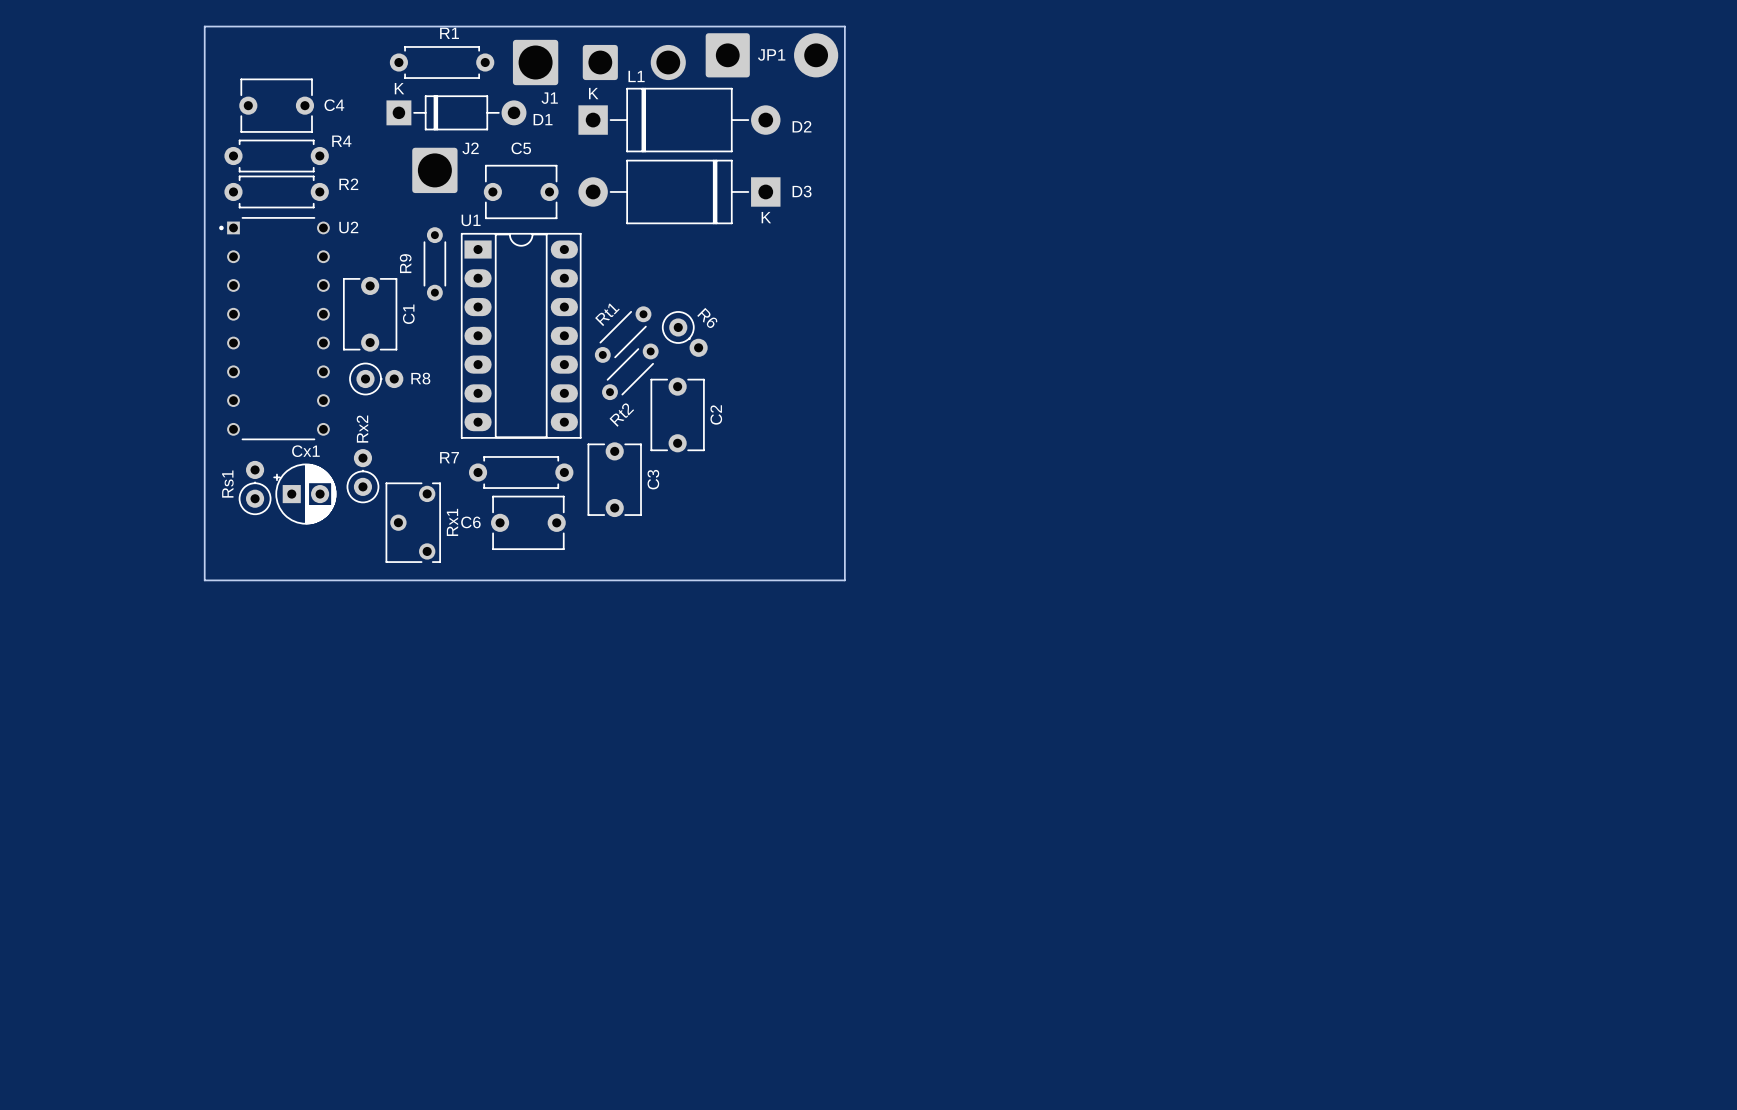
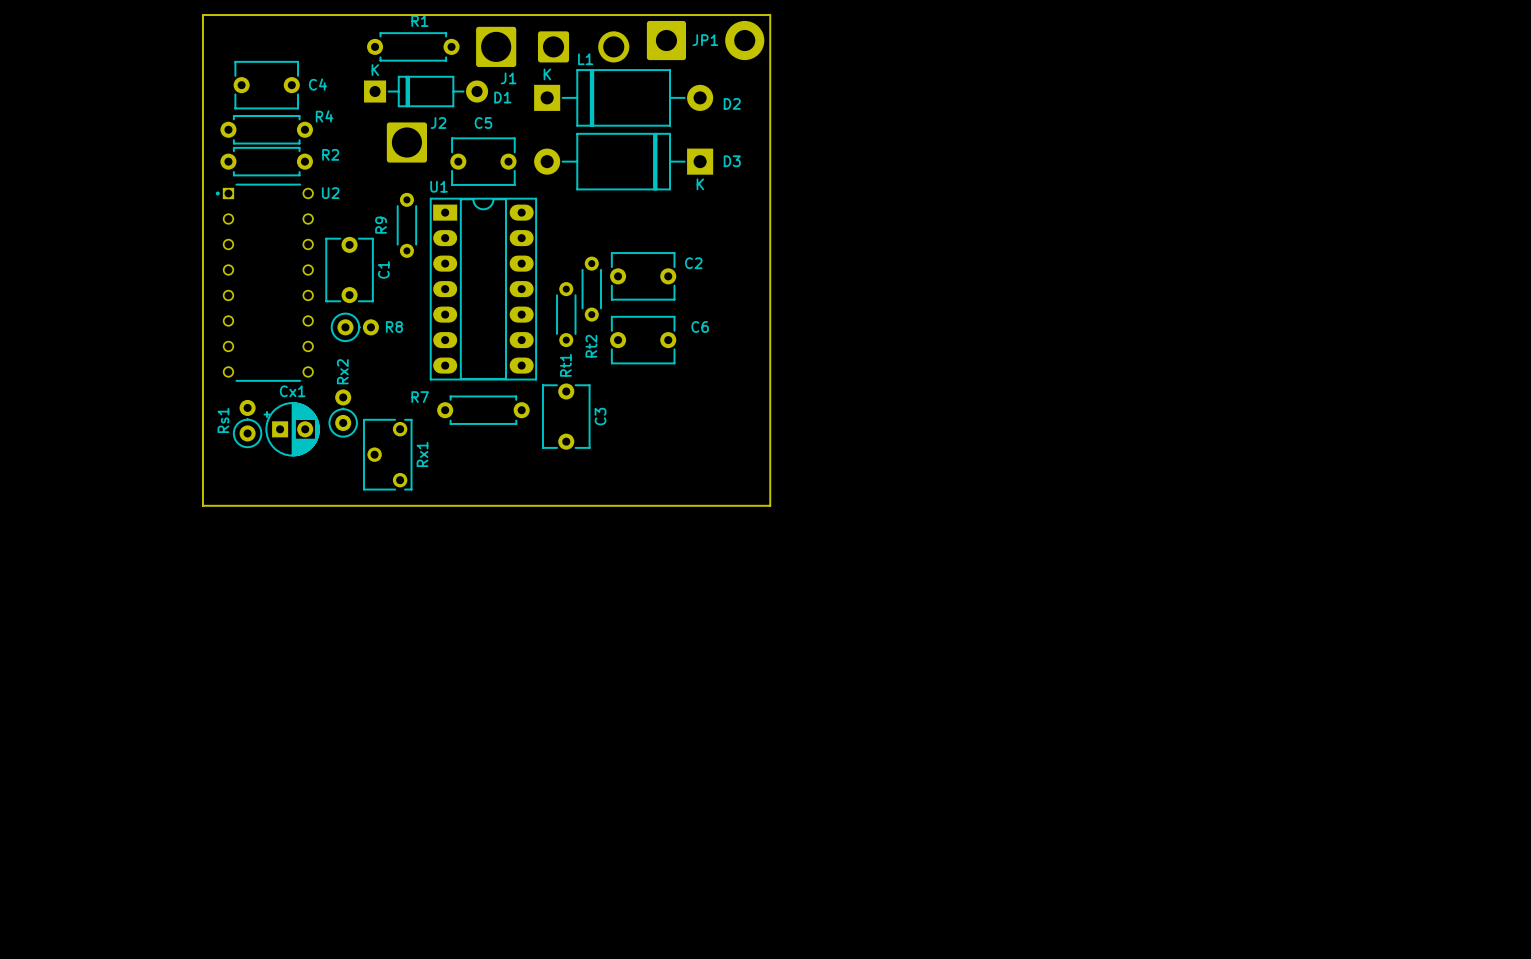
Rt1 name position: Rt1 (607, 314) -> Rt1 (565, 365)
Rt2 rotation: 0° (623, 334) -> 45° counterclockwise (591, 289)
R6: (684, 334) -> none
Rt1 rotation: 0° (630, 371) -> 45° counterclockwise (566, 314)
C2 rotation: 0° (677, 414) -> 90° clockwise (643, 276)
C2 position: (677, 414) -> (643, 276)
C2 name position: C2 (716, 414) -> C2 (693, 263)
C6 name position: C6 (470, 522) -> C6 (700, 326)
C6 position: (528, 522) -> (643, 340)

